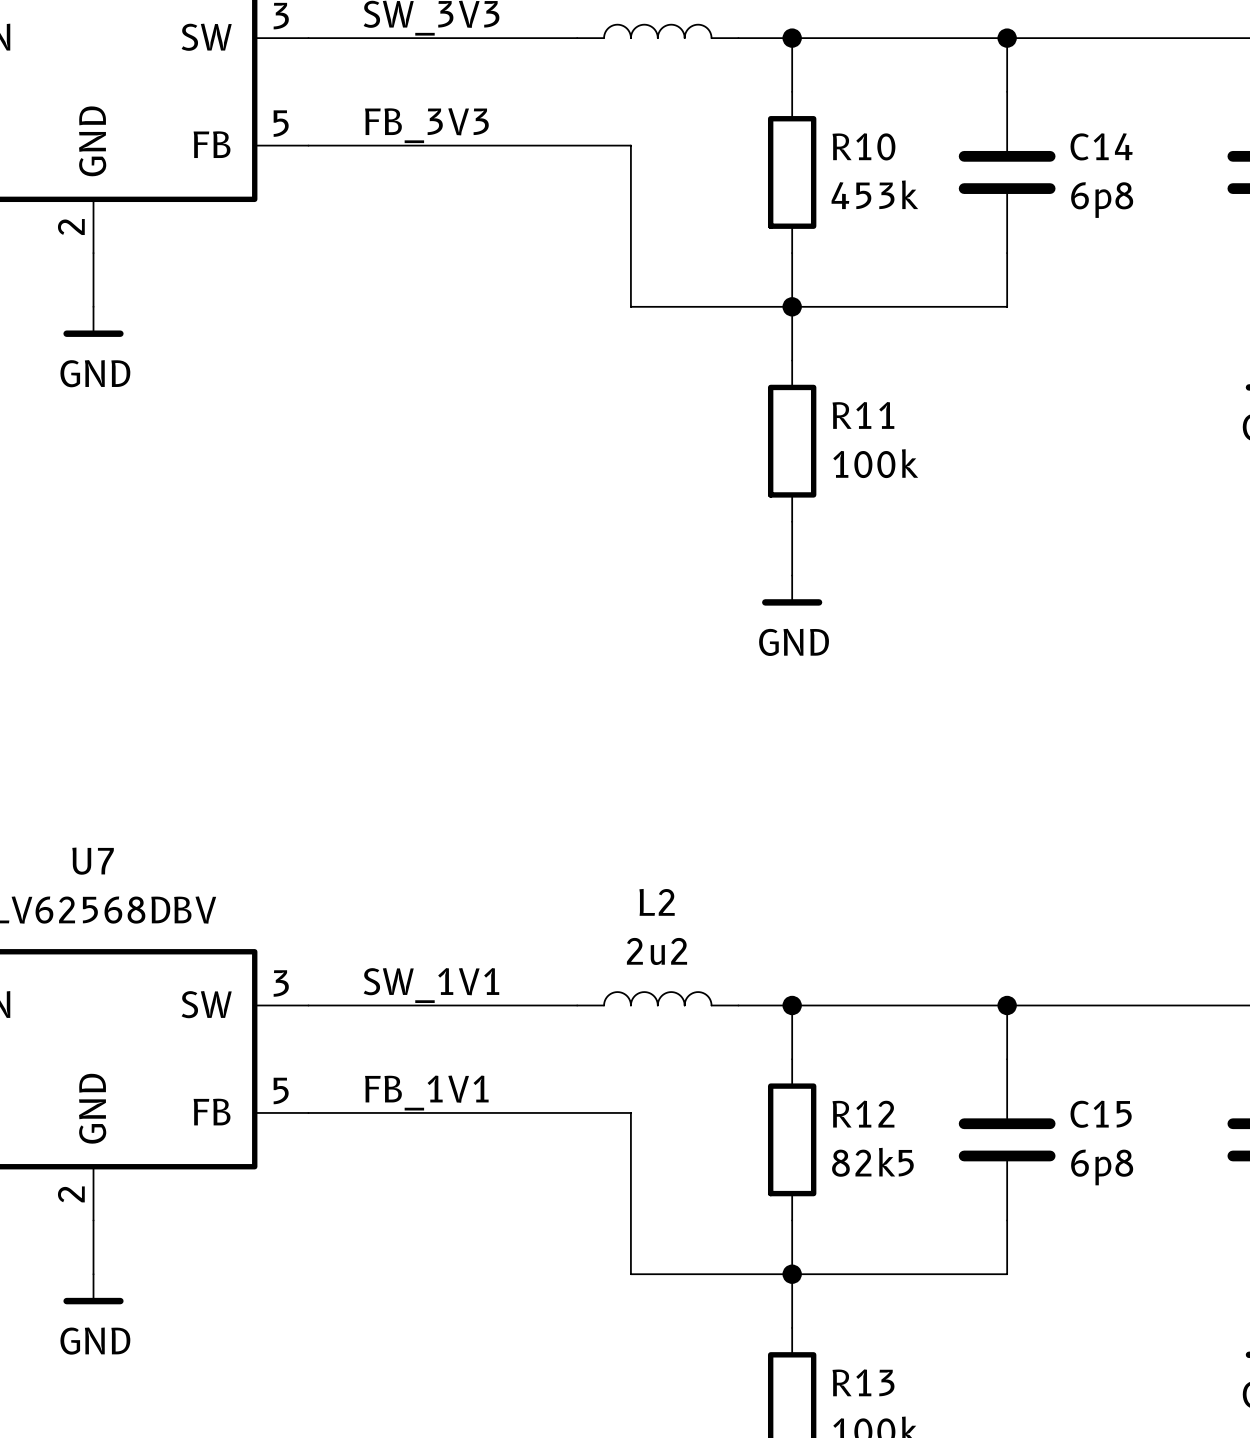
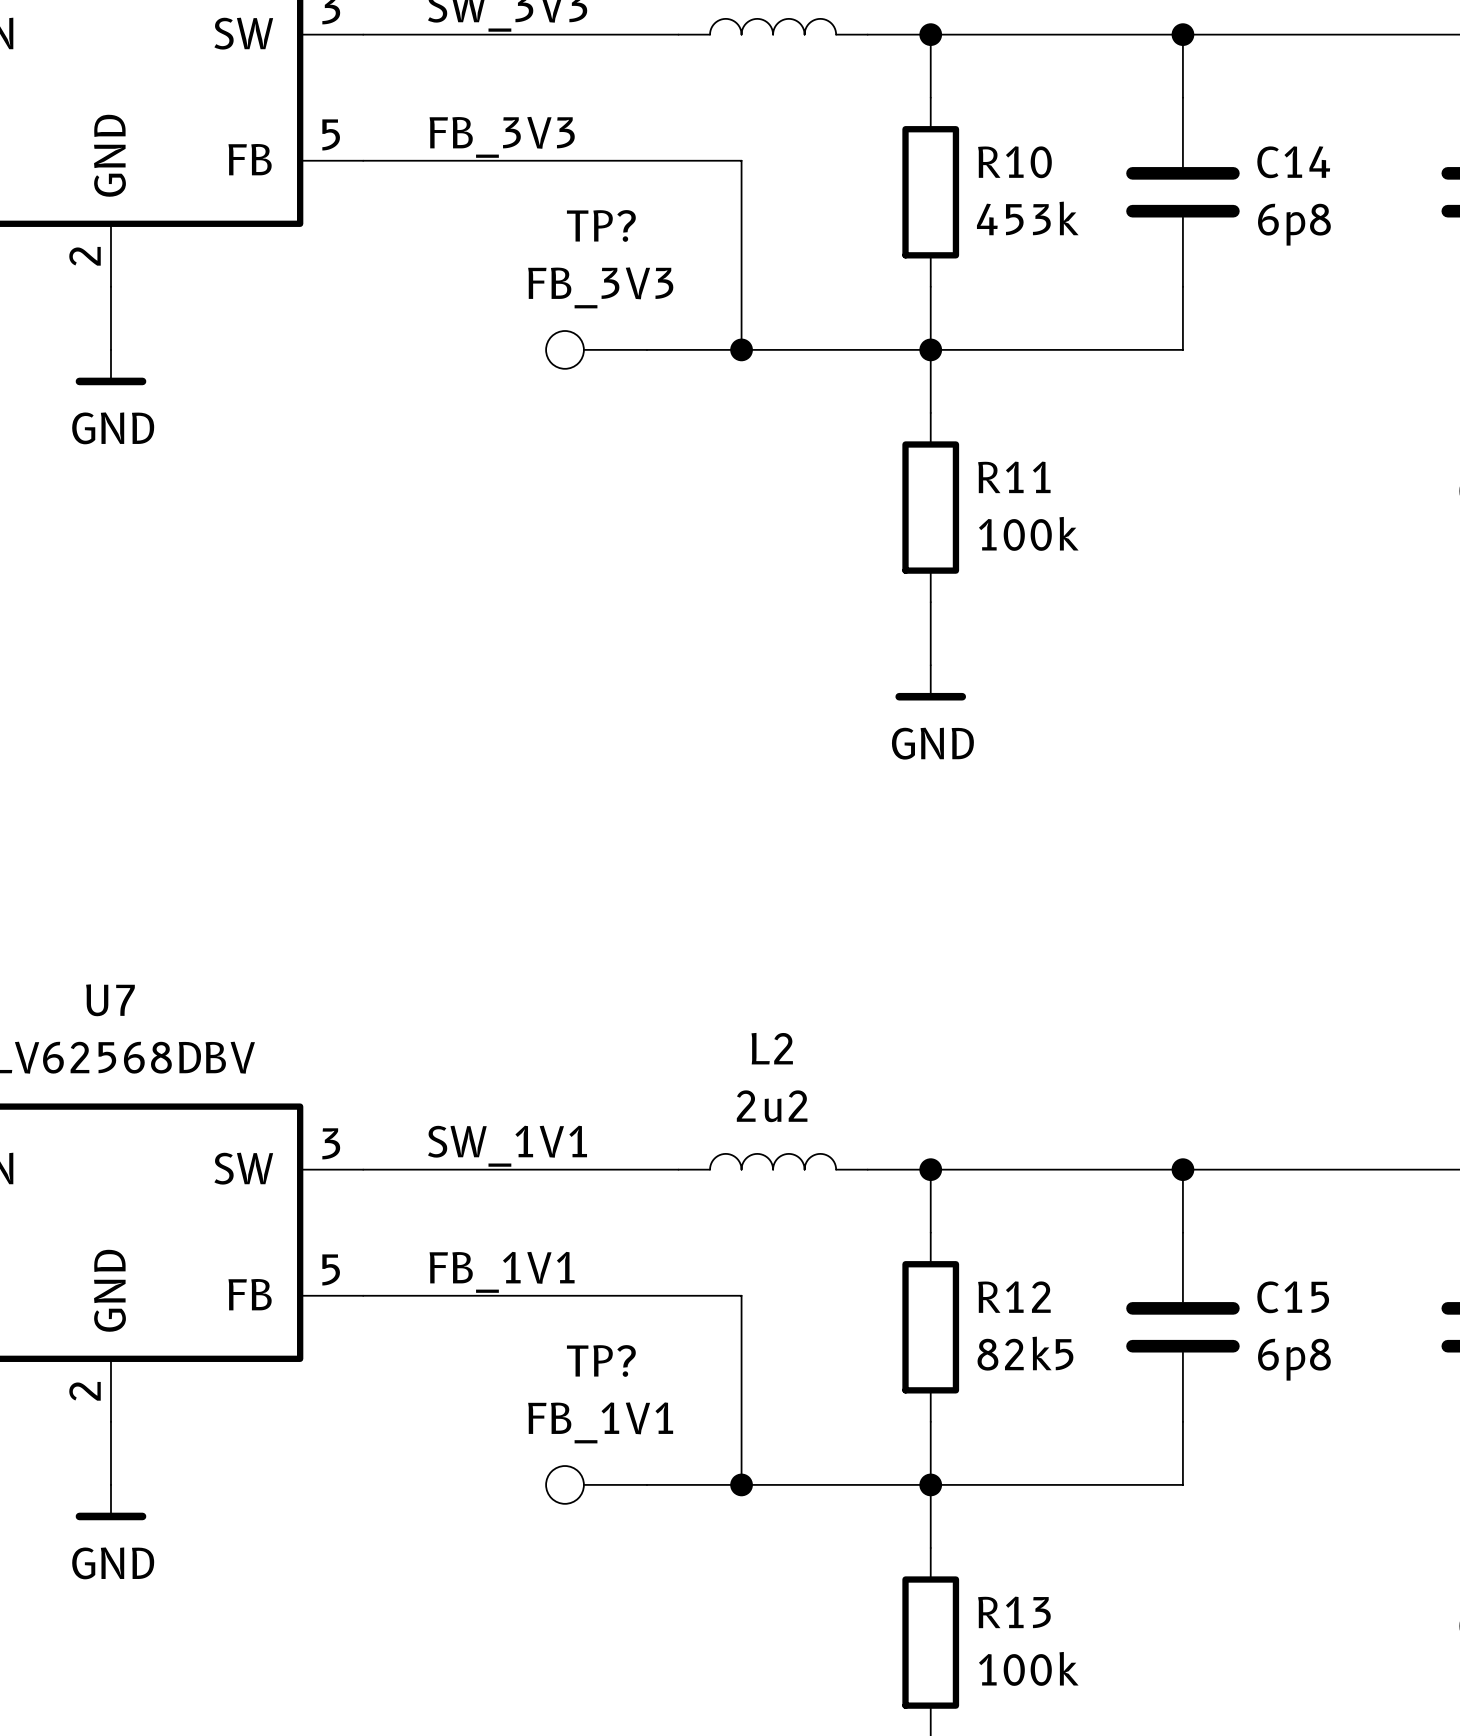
TP?: none -> FB_3V3 (596, 349)
wire: none -> (646, 349) (741, 349)
junction: none -> (741, 349)
TP?: none -> FB_1V1 (596, 1484)
wire: none -> (646, 1484) (741, 1484)
junction: none -> (741, 1484)

